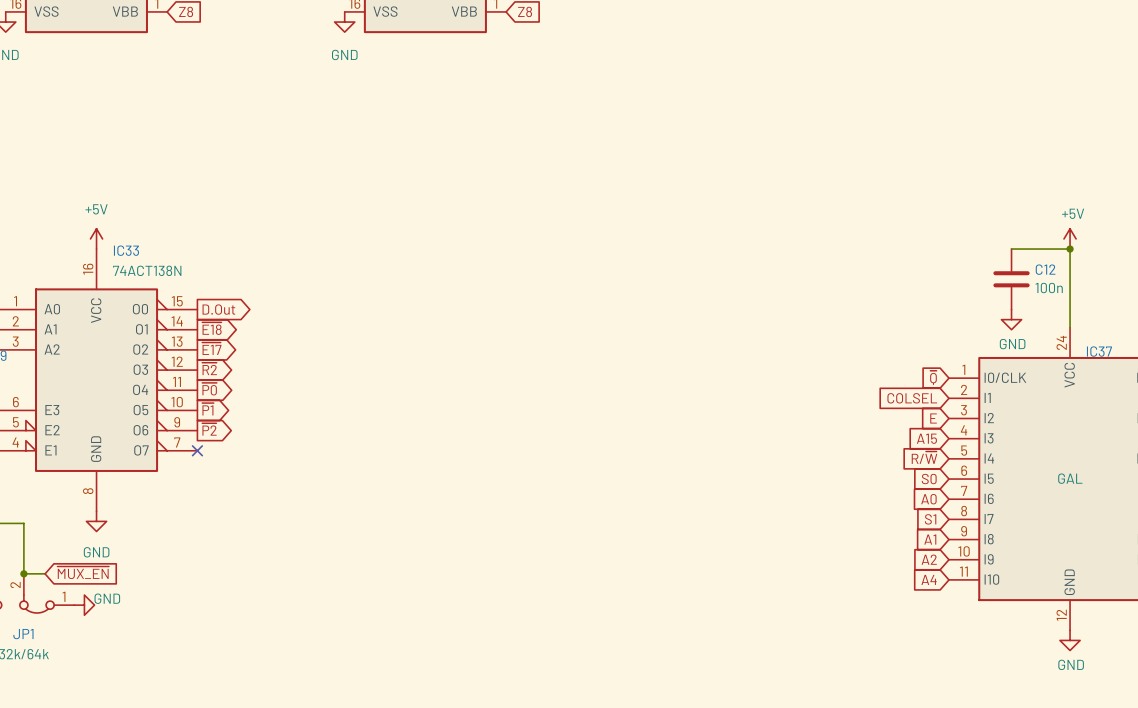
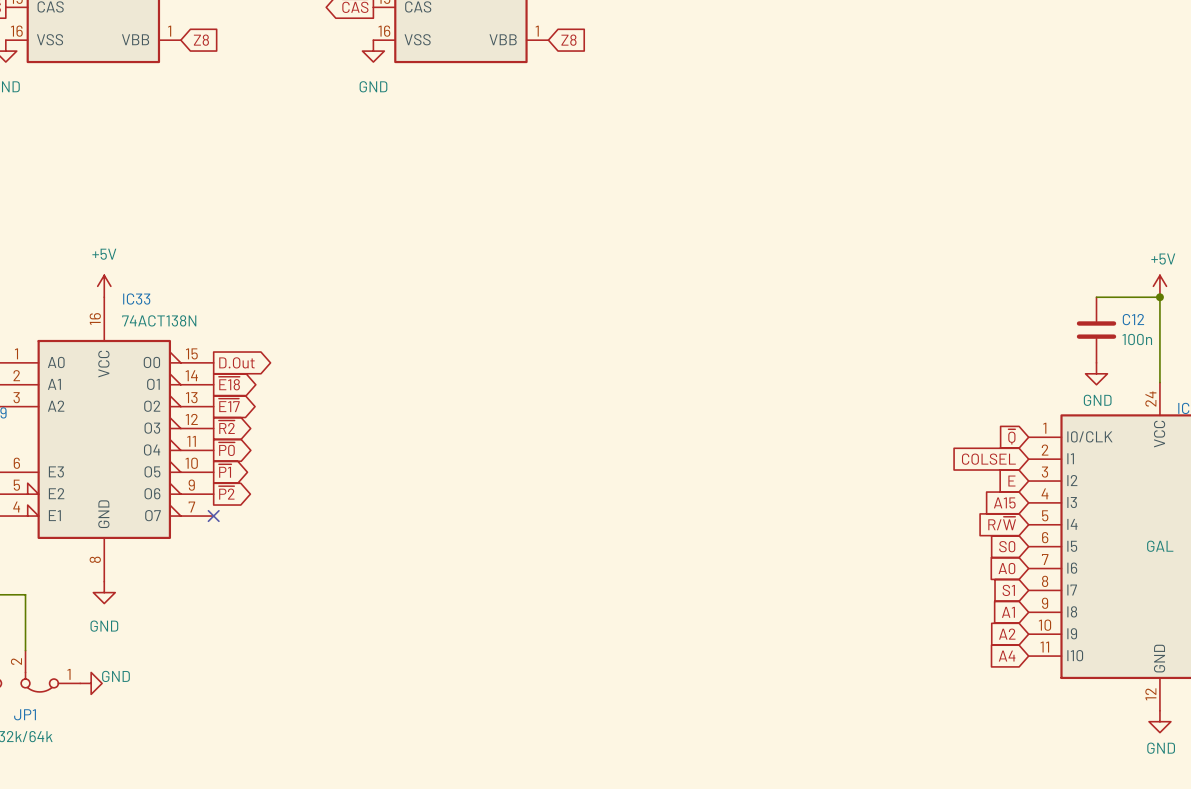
global label: ~{MUX_EN} (83, 572) -> none
wire: (23, 573) (45, 573) -> none
junction: (23, 573) -> none

